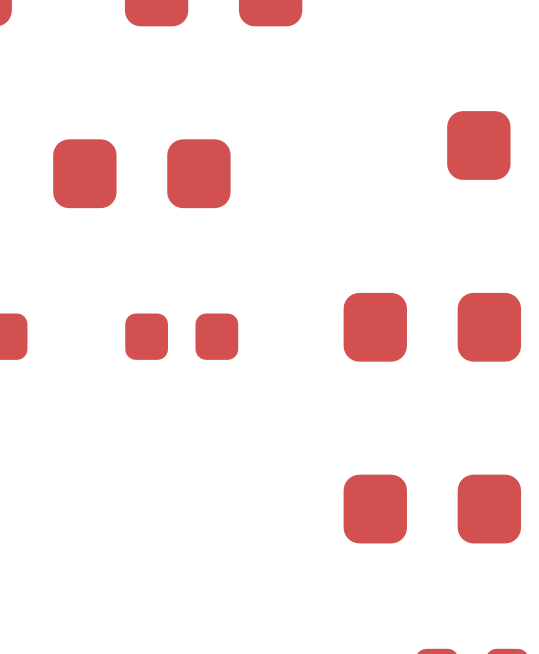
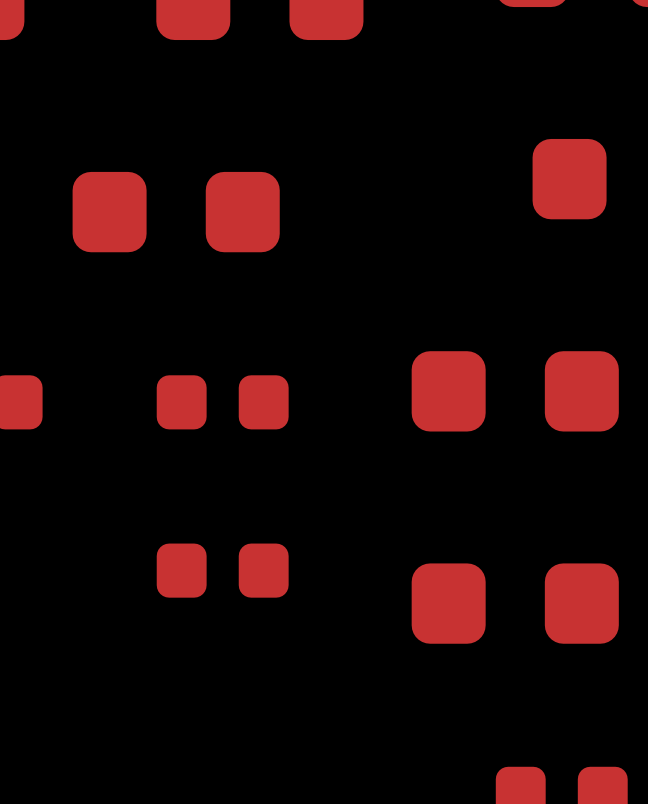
part: none -> (222, 570)

